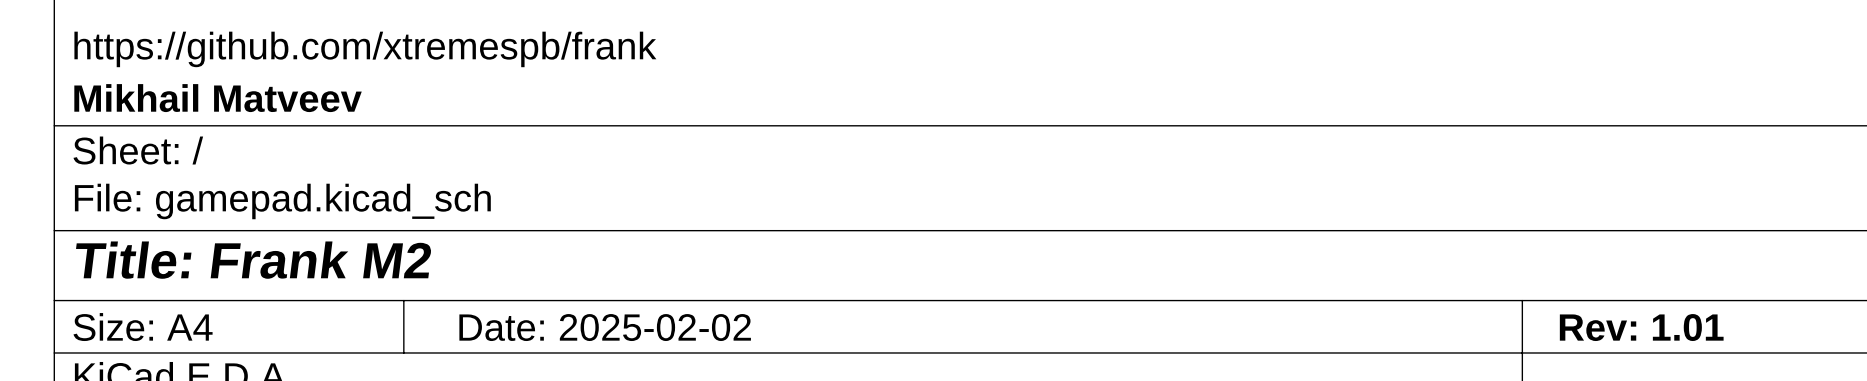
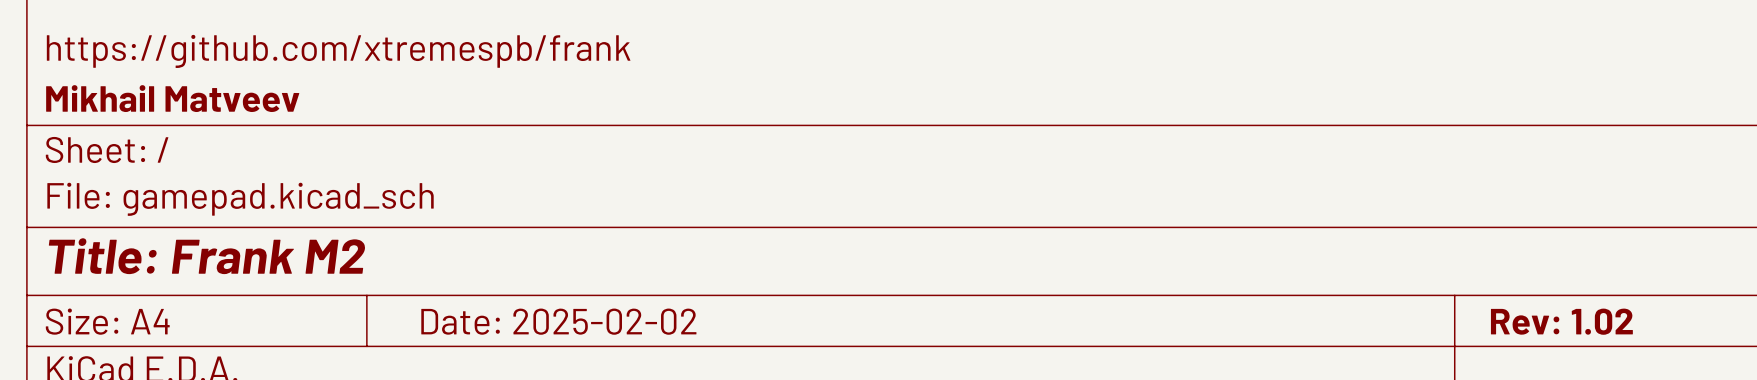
title block: Rev: 1.01 (1641, 327) -> Rev: 1.02 (1561, 321)

